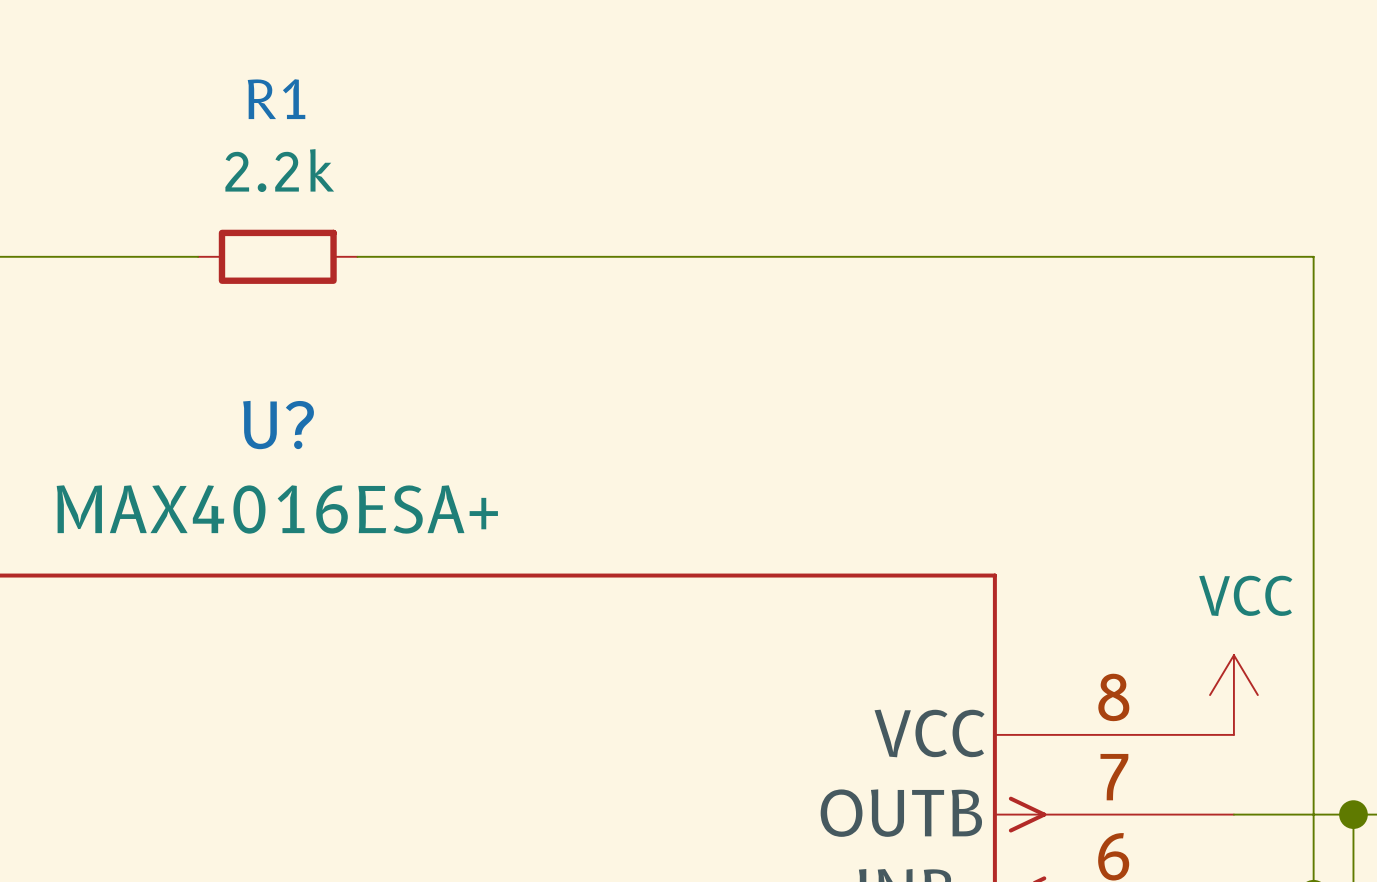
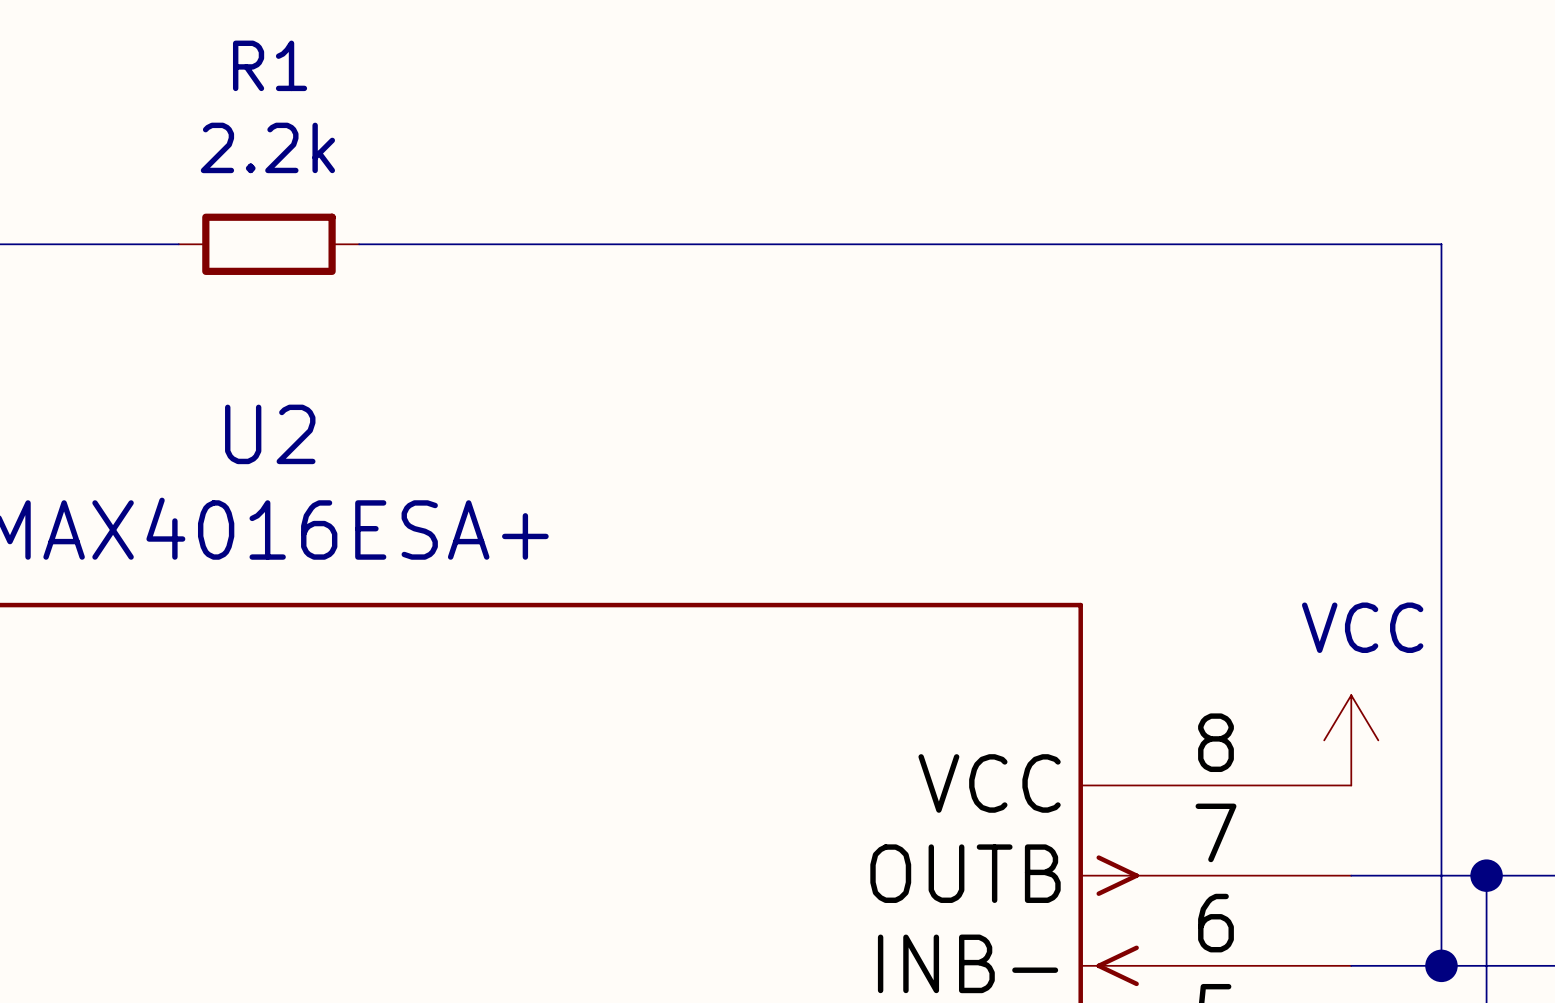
U? name: U? (278, 425) -> U2 (270, 434)

